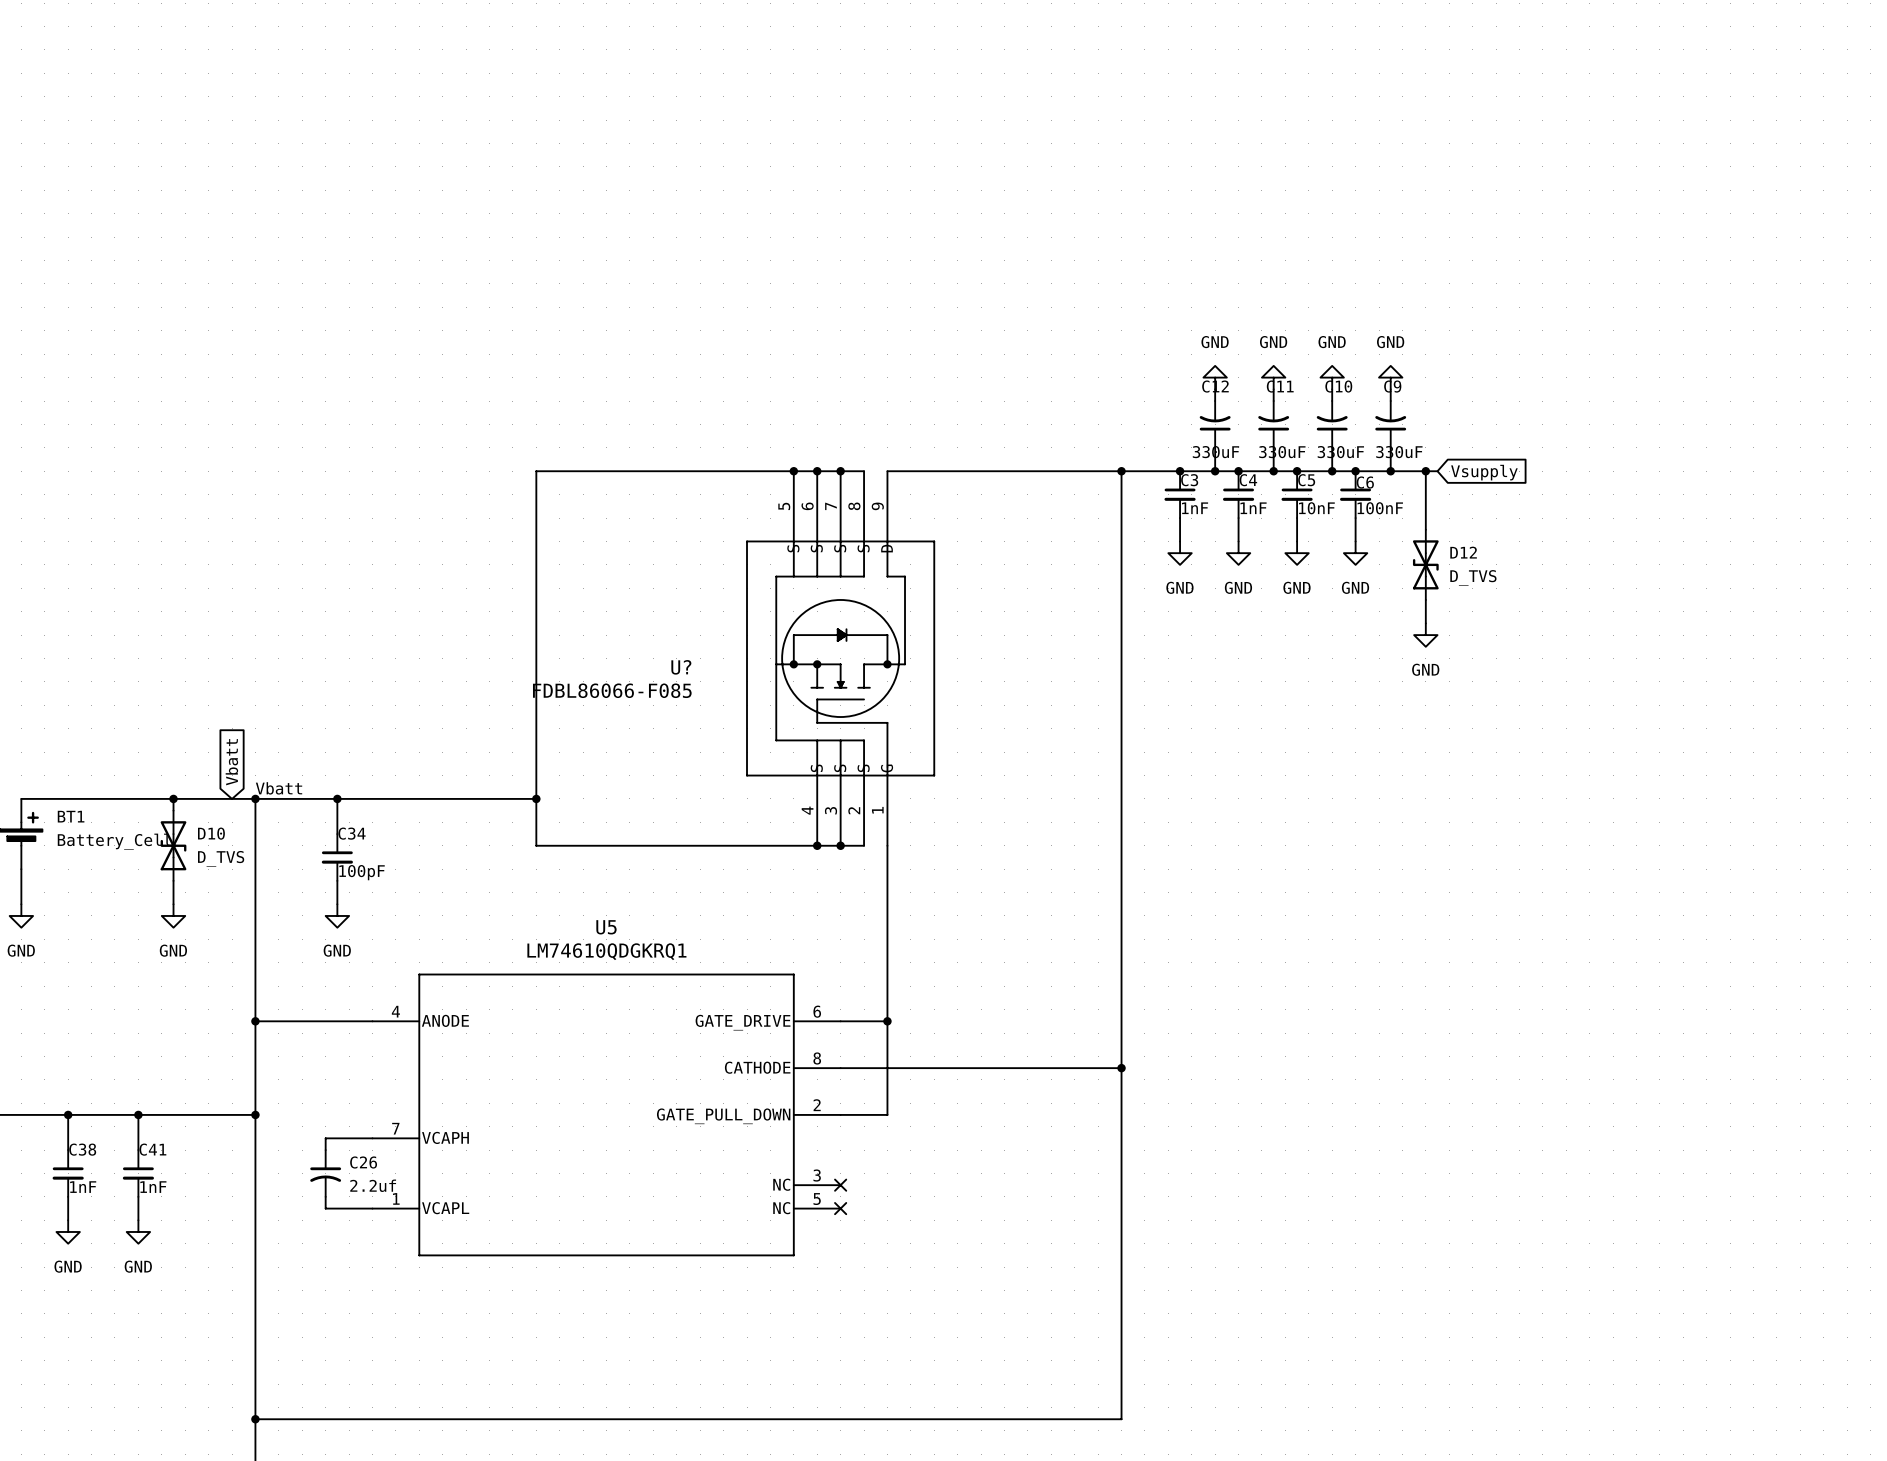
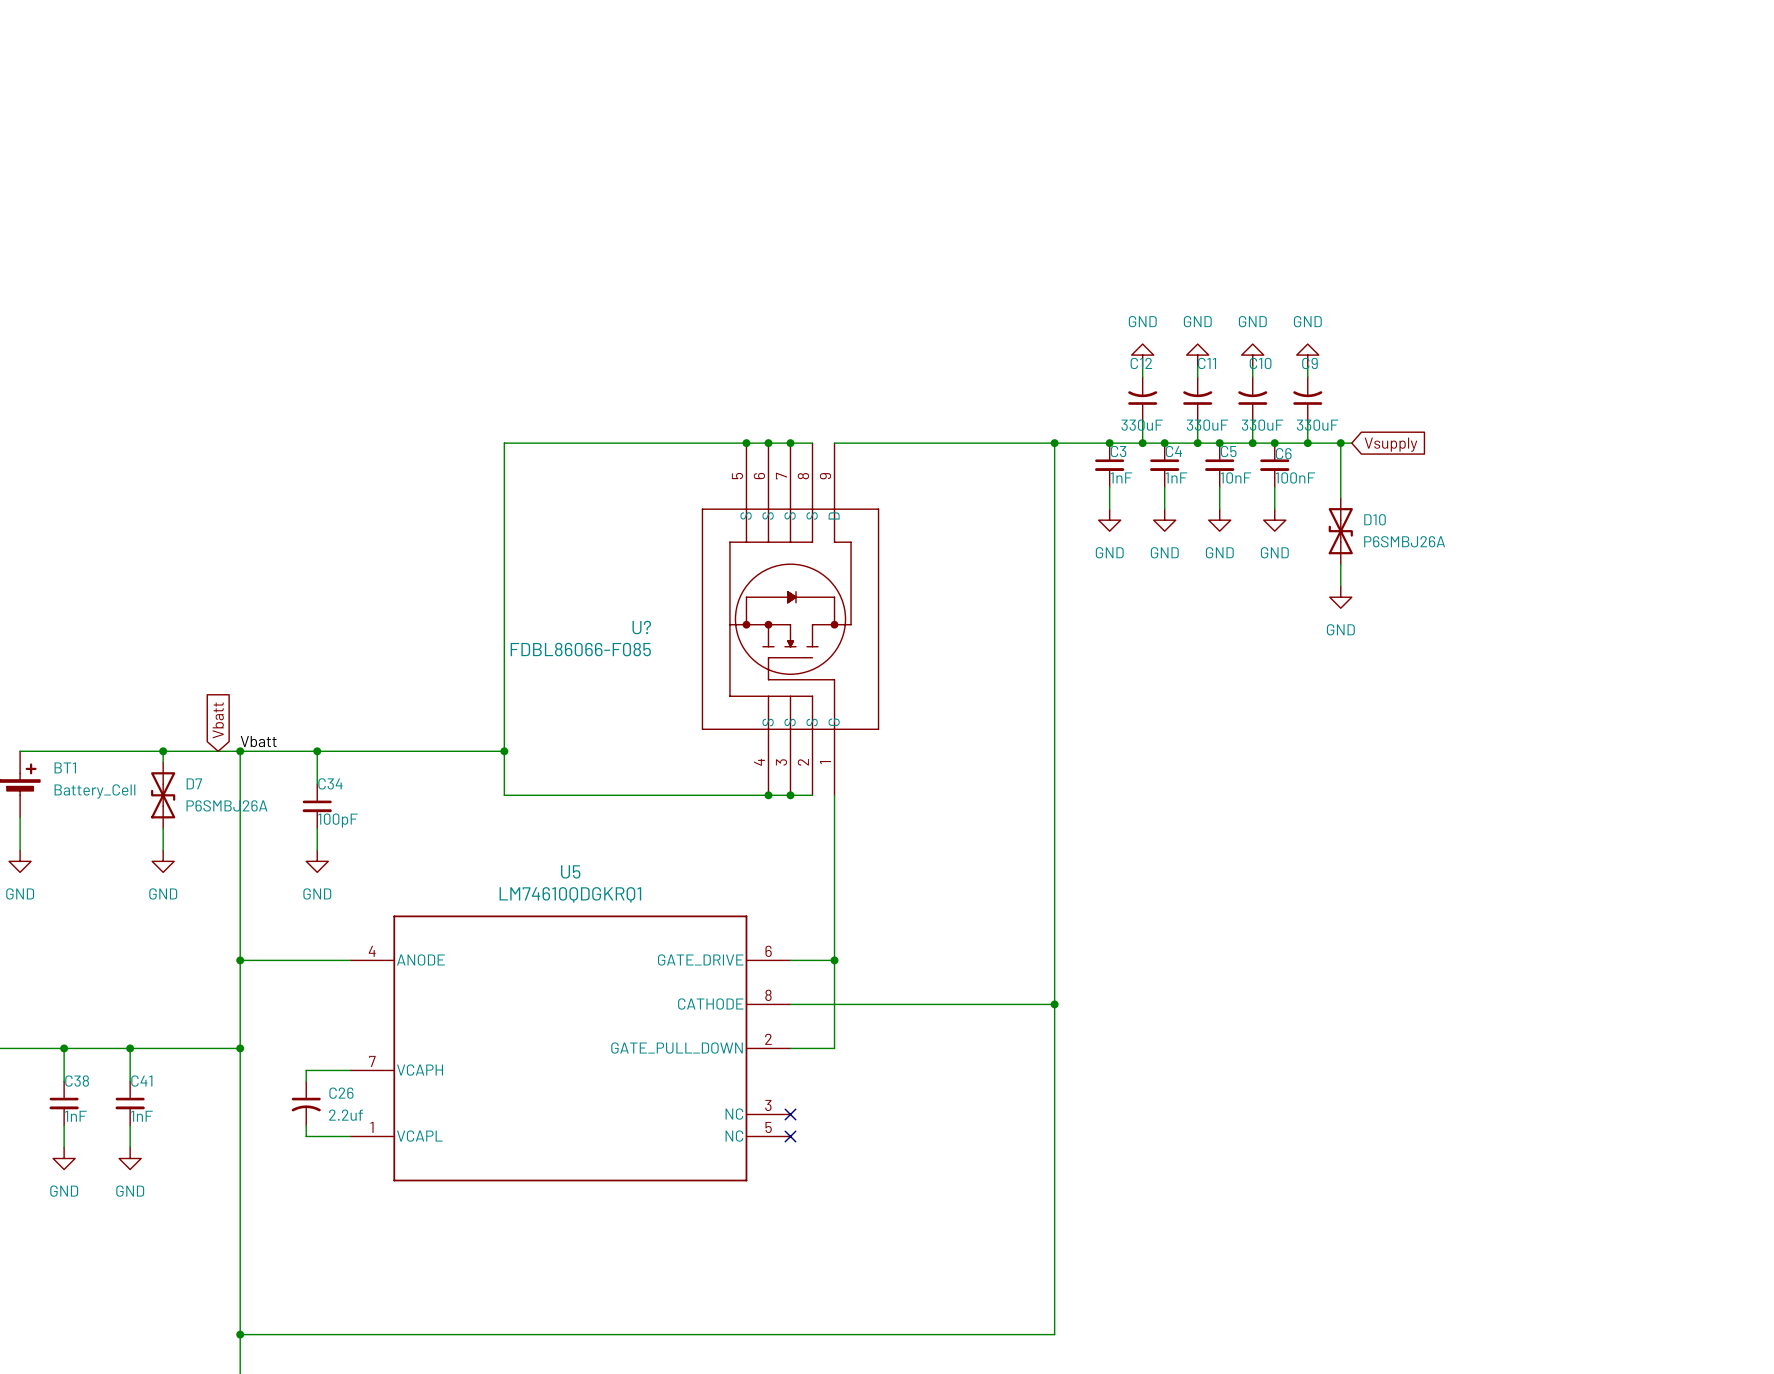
D12 name: D12 (1463, 552) -> D10 (1375, 519)
D12 value: D_TVS (1473, 577) -> P6SMBJ26A (1404, 541)
D10 name: D10 (211, 833) -> D7 (194, 783)
D10 value: D_TVS (221, 858) -> P6SMBJ26A (227, 805)

